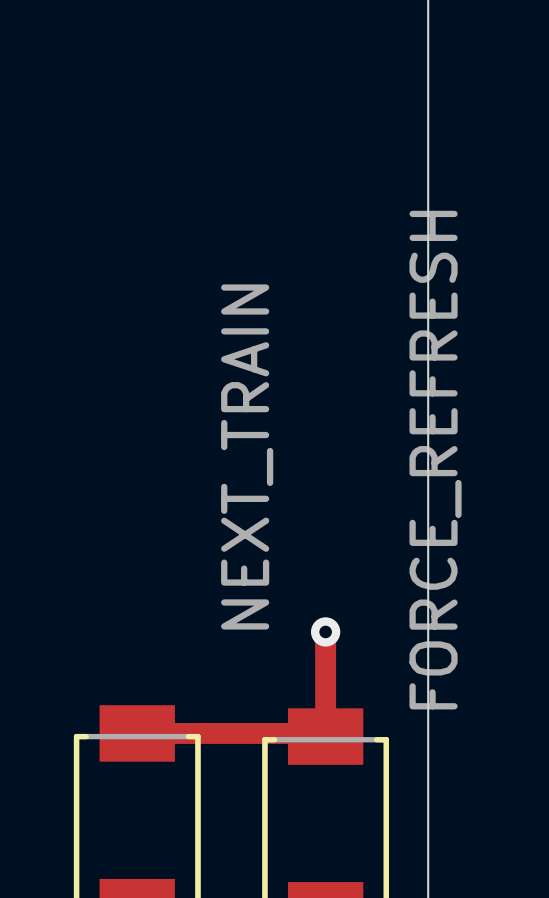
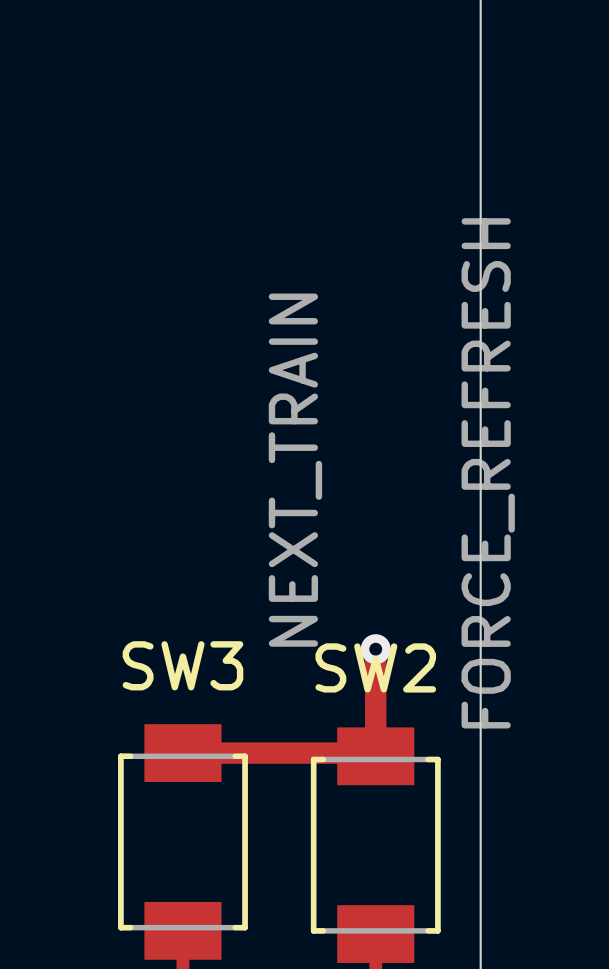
SW3 name: none -> SW3 (182, 665)
SW2 name: none -> SW2 (375, 667)

